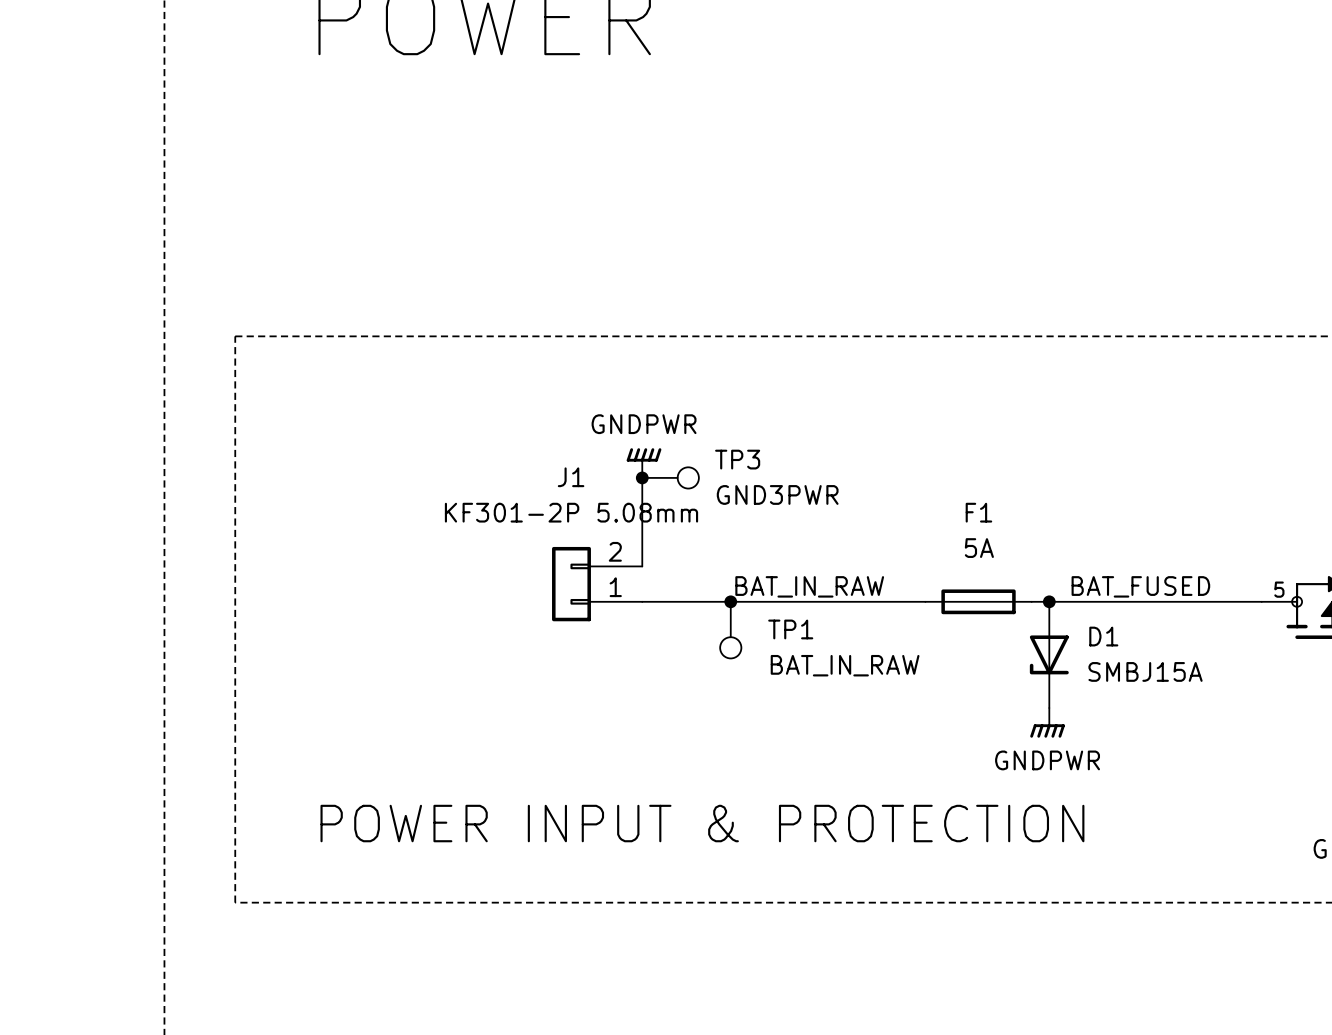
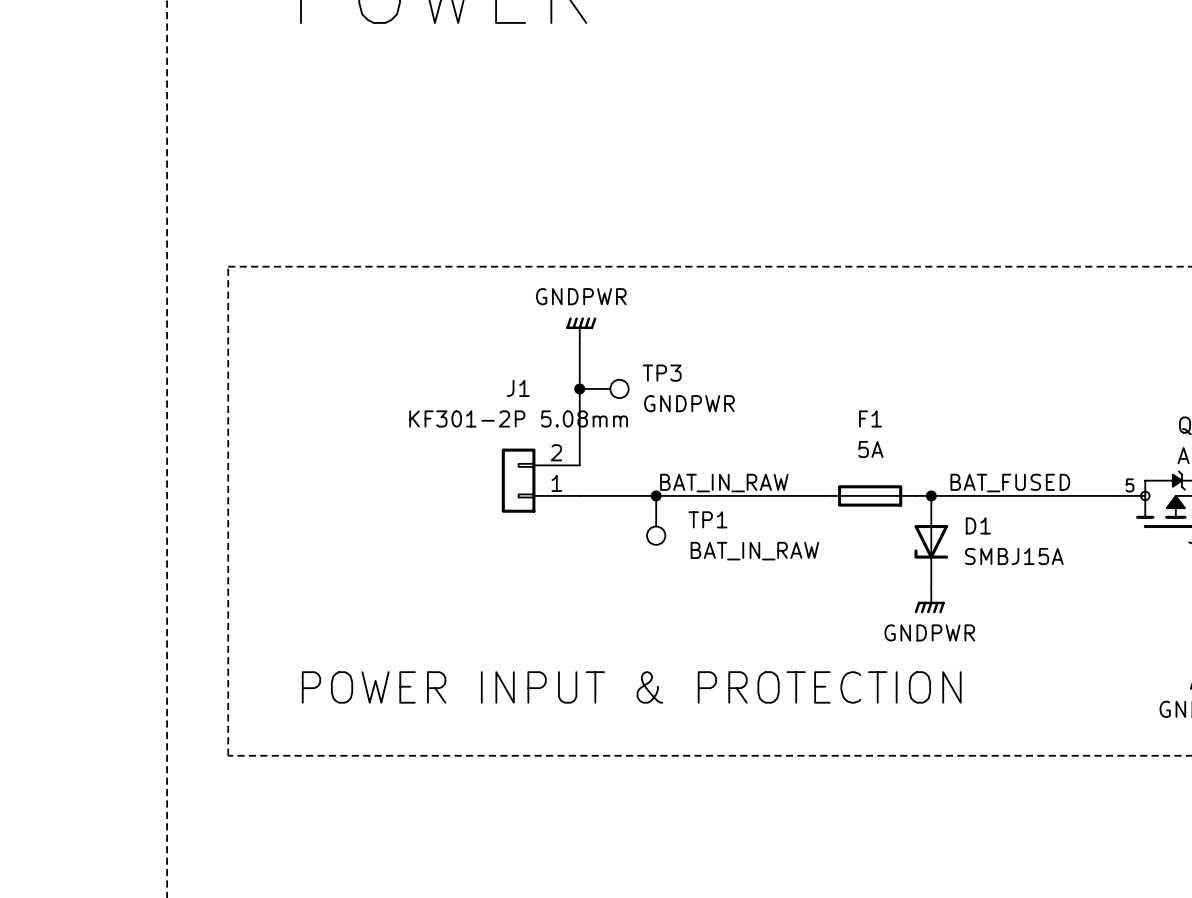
wire: none -> (579, 343) (579, 388)
power symbol position: GNDPWR (644, 463) -> GNDPWR (581, 330)
TP3 value: GND3PWR (777, 494) -> GNDPWR (689, 403)

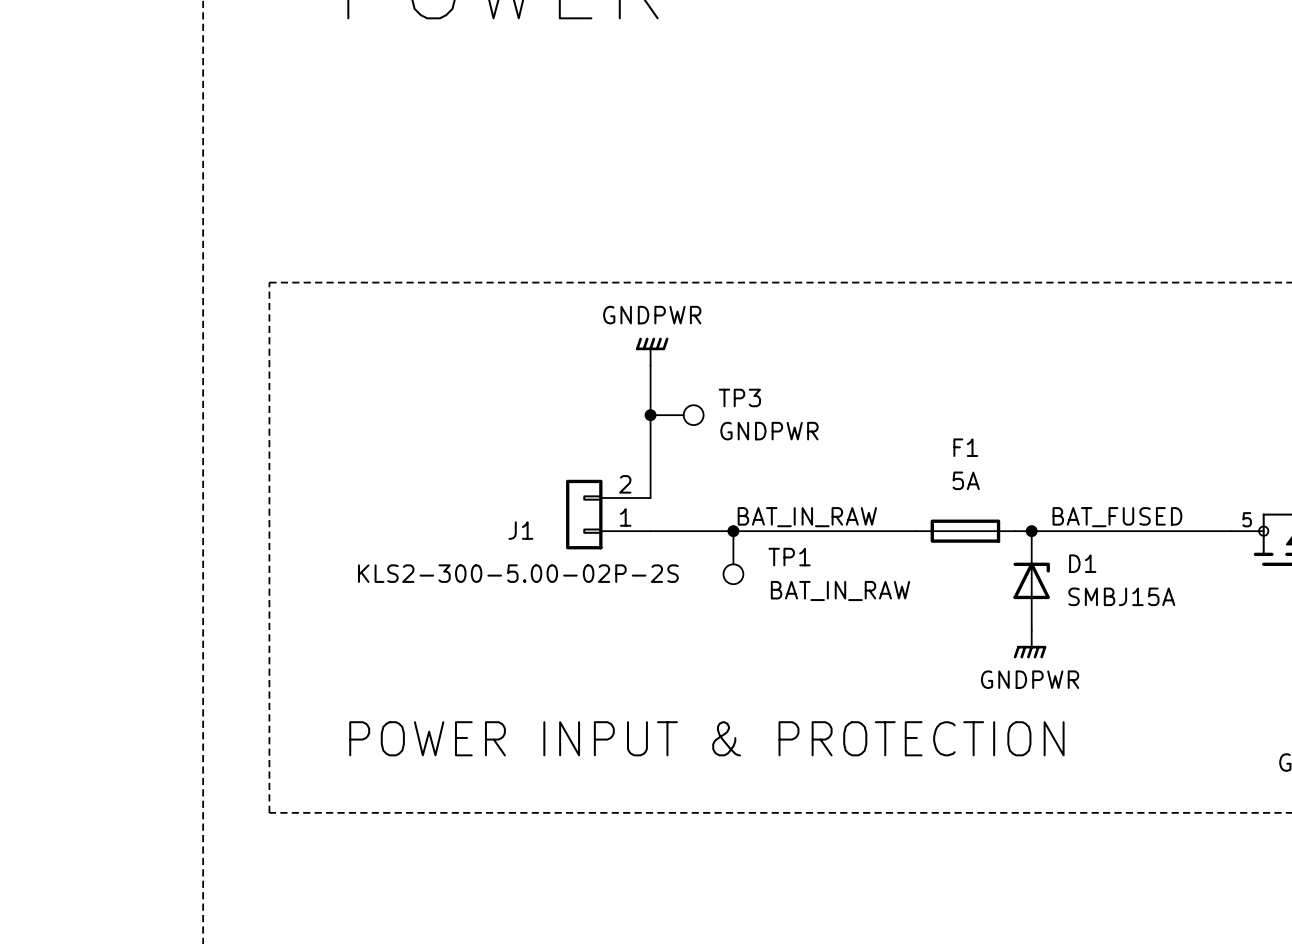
J1 name position: J1 (518, 388) -> J1 (520, 530)
J1 value: KF301-2P 5.08mm (518, 418) -> KLS2-300-5.00-02P-2S (518, 573)
D1 rotation: 0° (931, 541) -> 180° (1031, 580)

